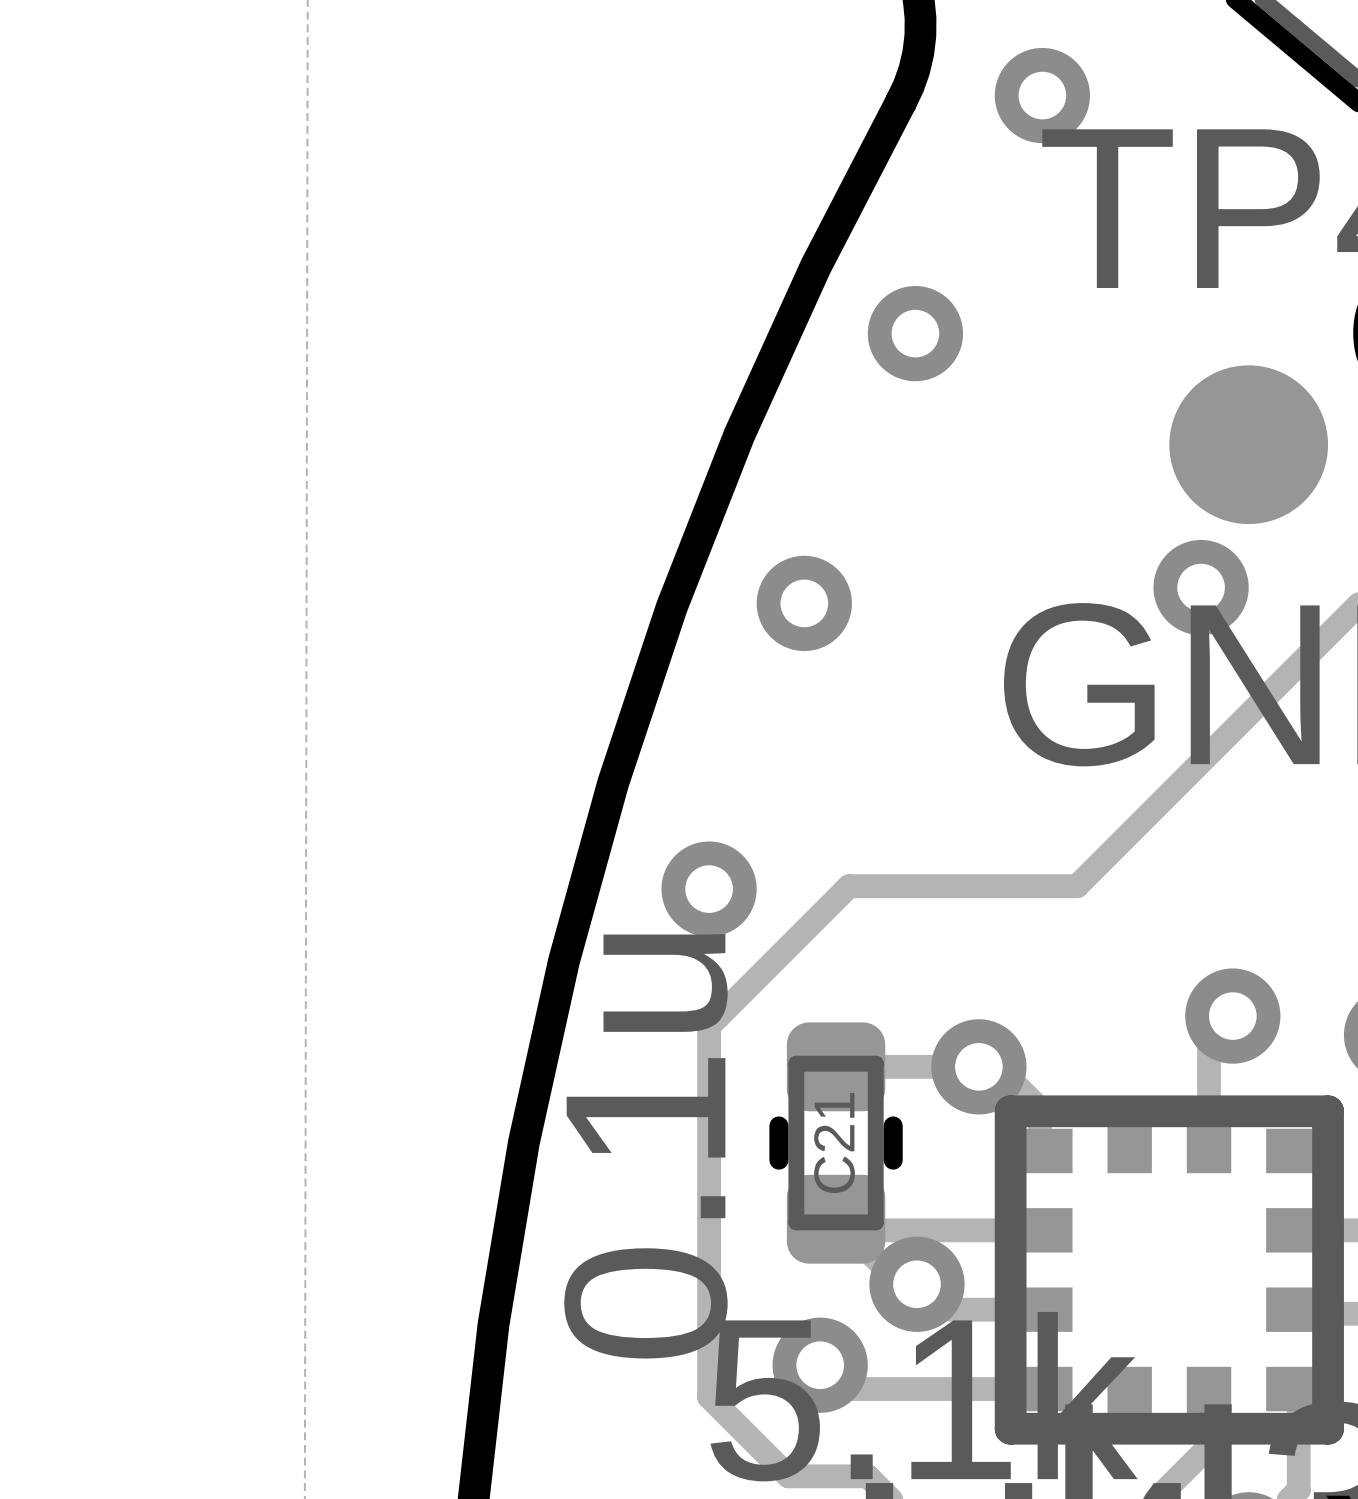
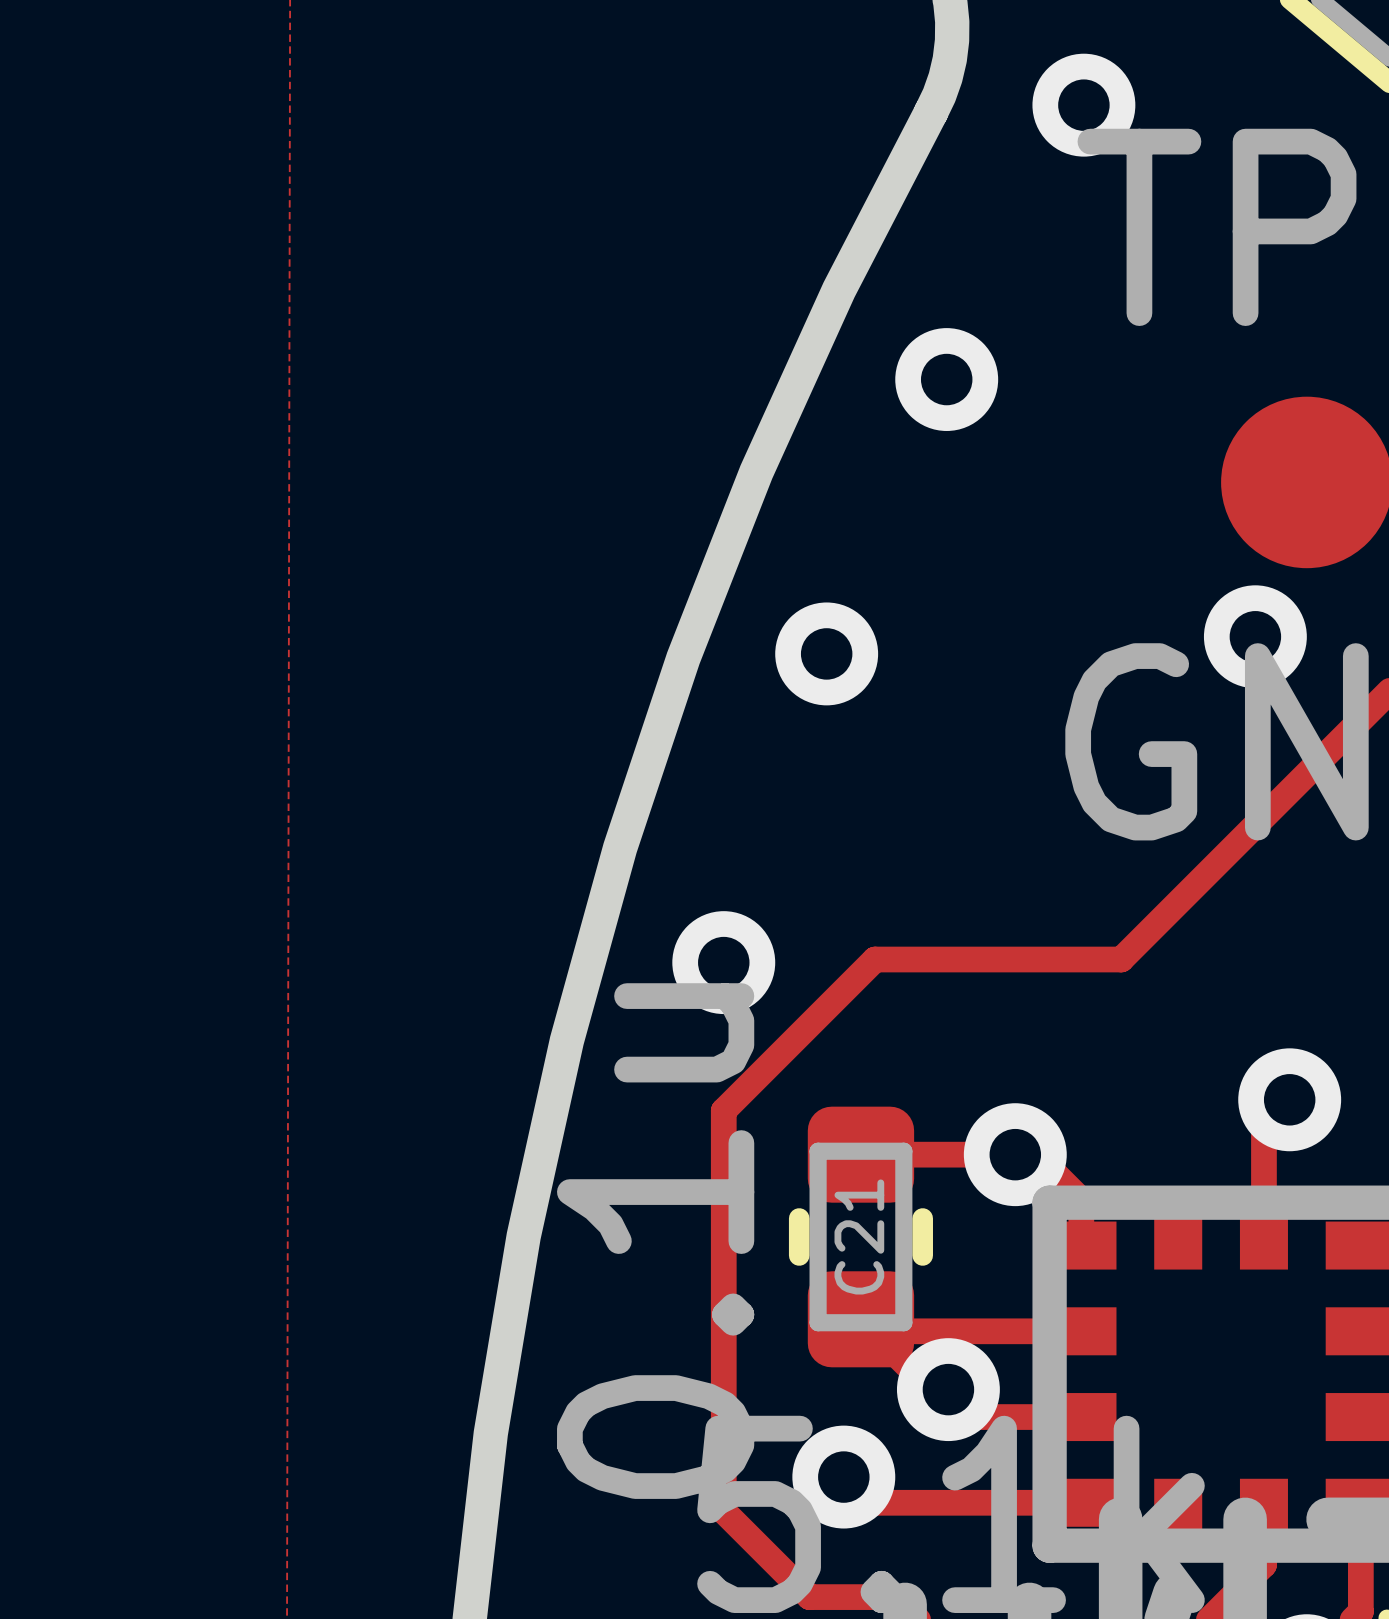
via position: (915, 333) -> (946, 379)

